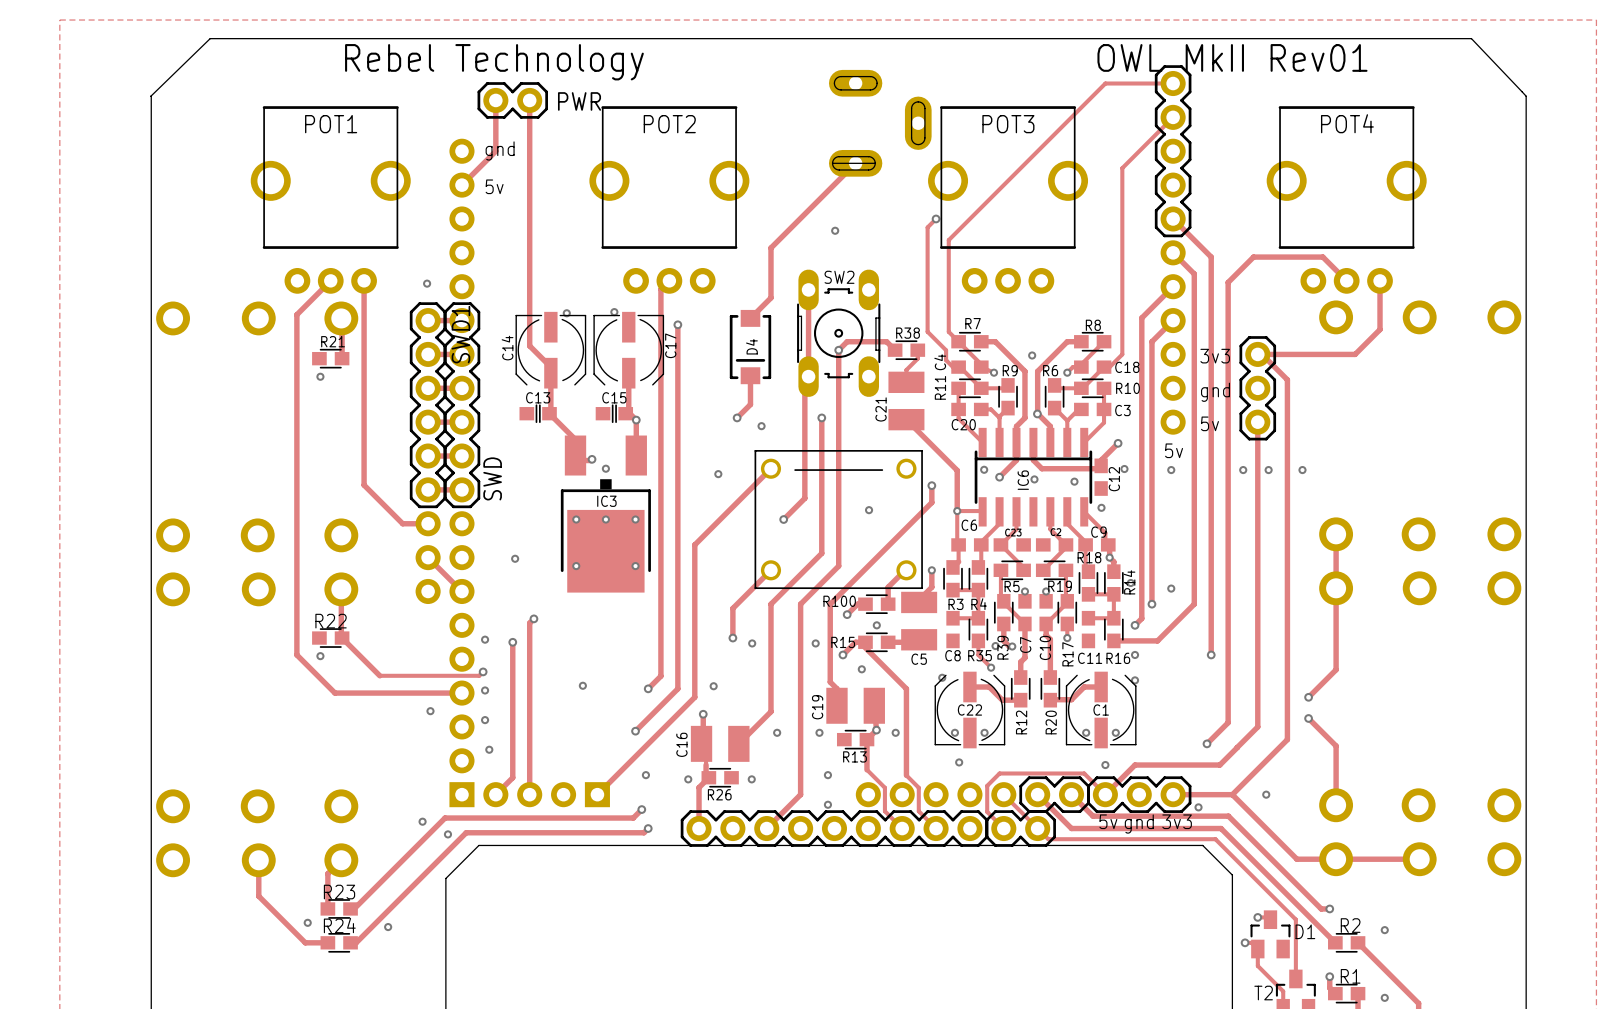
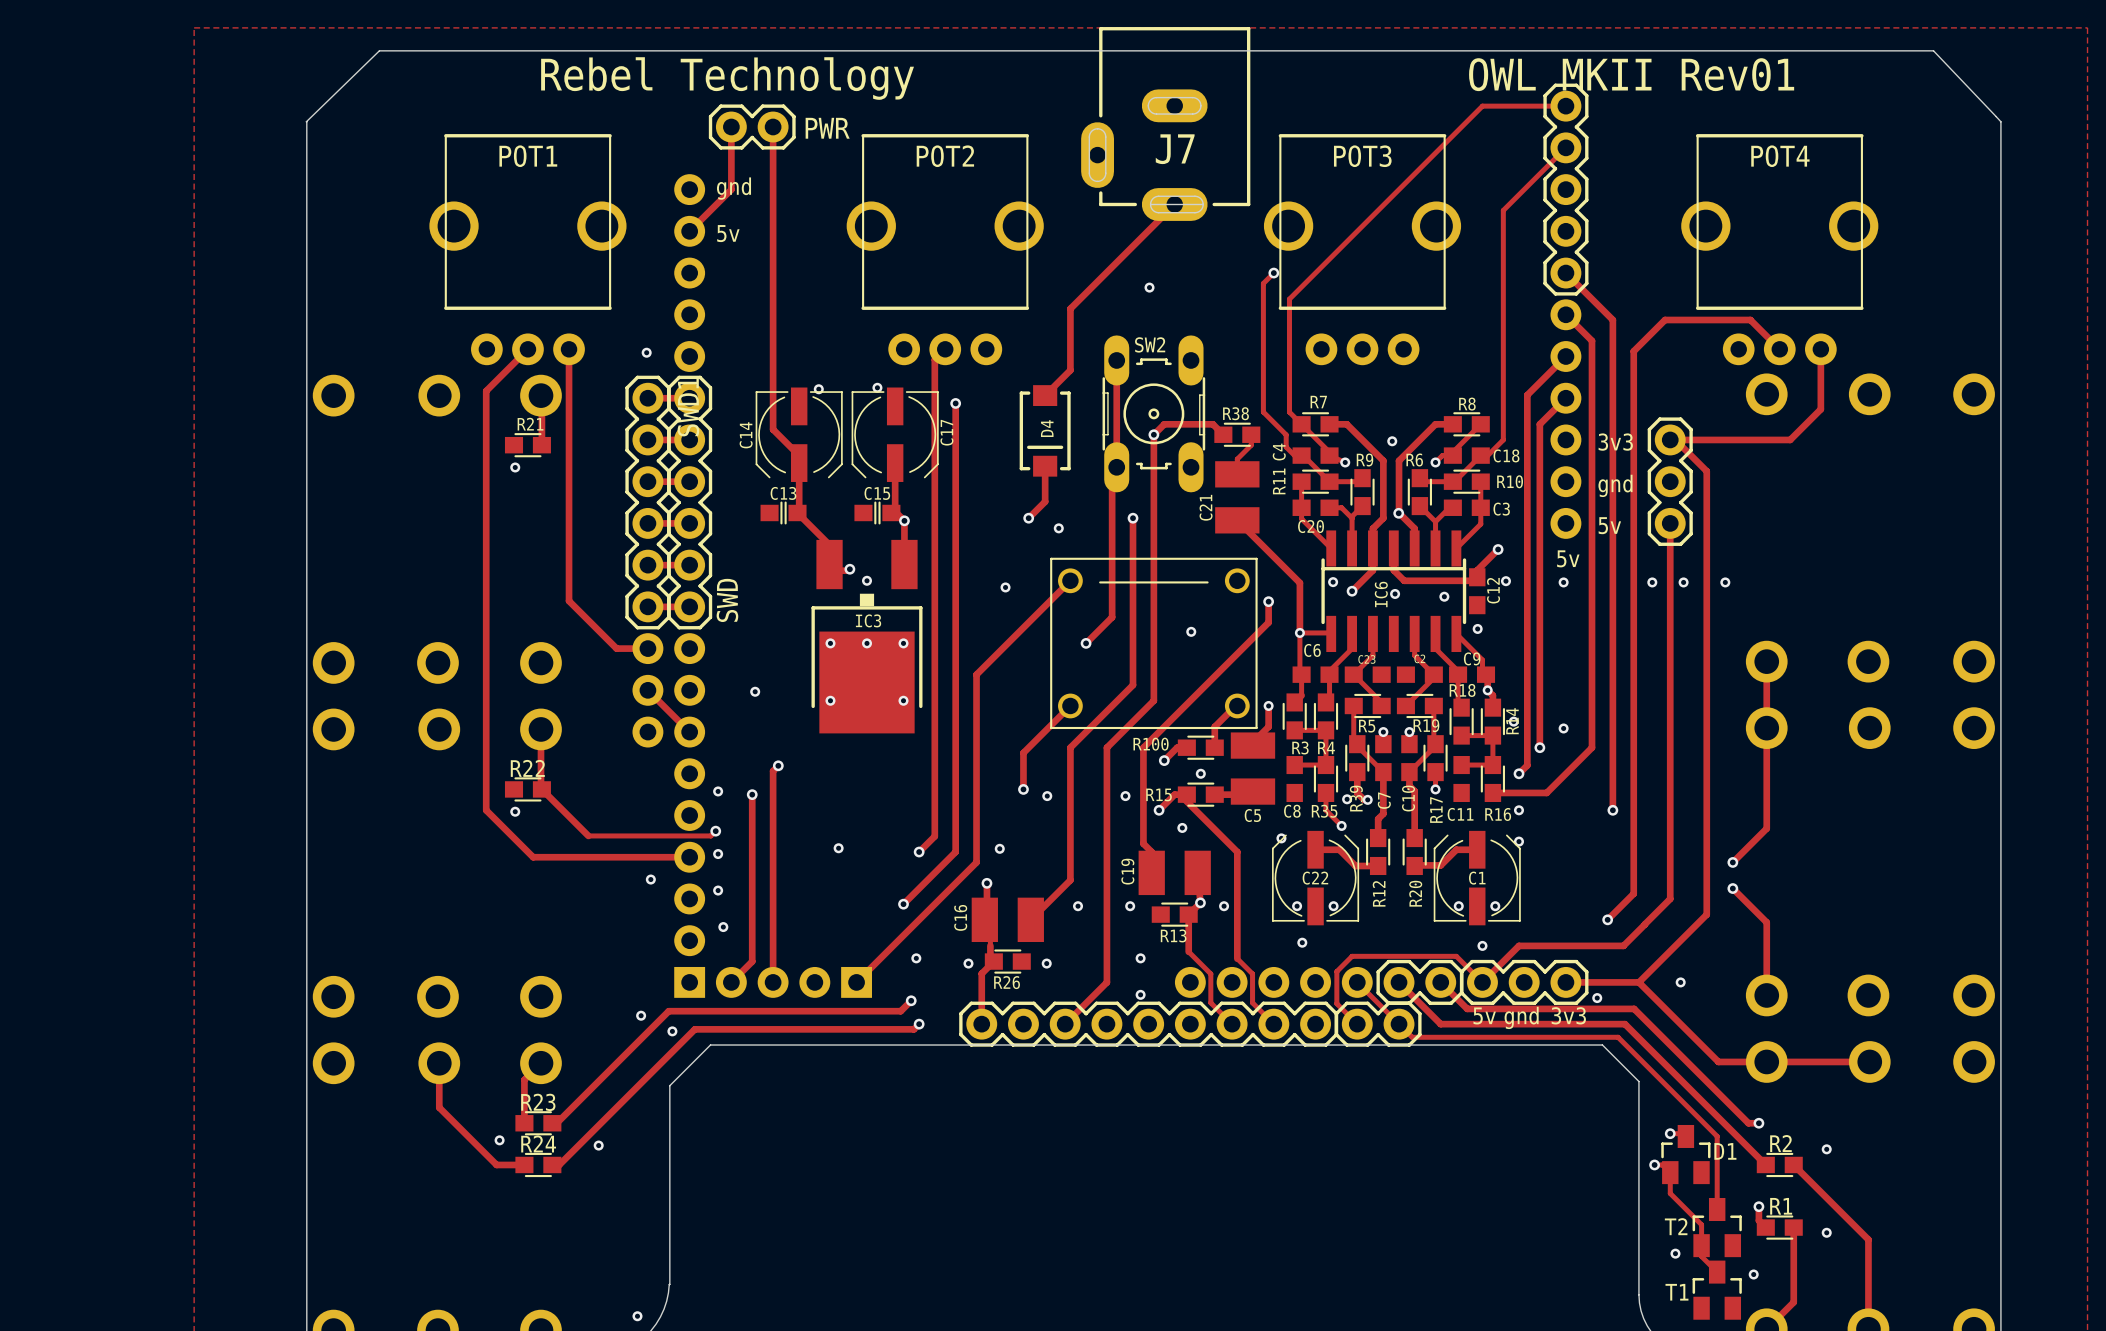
text: OWL MkII Rev01 (1232, 57) -> OWL MKII Rev01 (1631, 74)
J7 side: bottom (880, 123) -> top (1165, 123)

